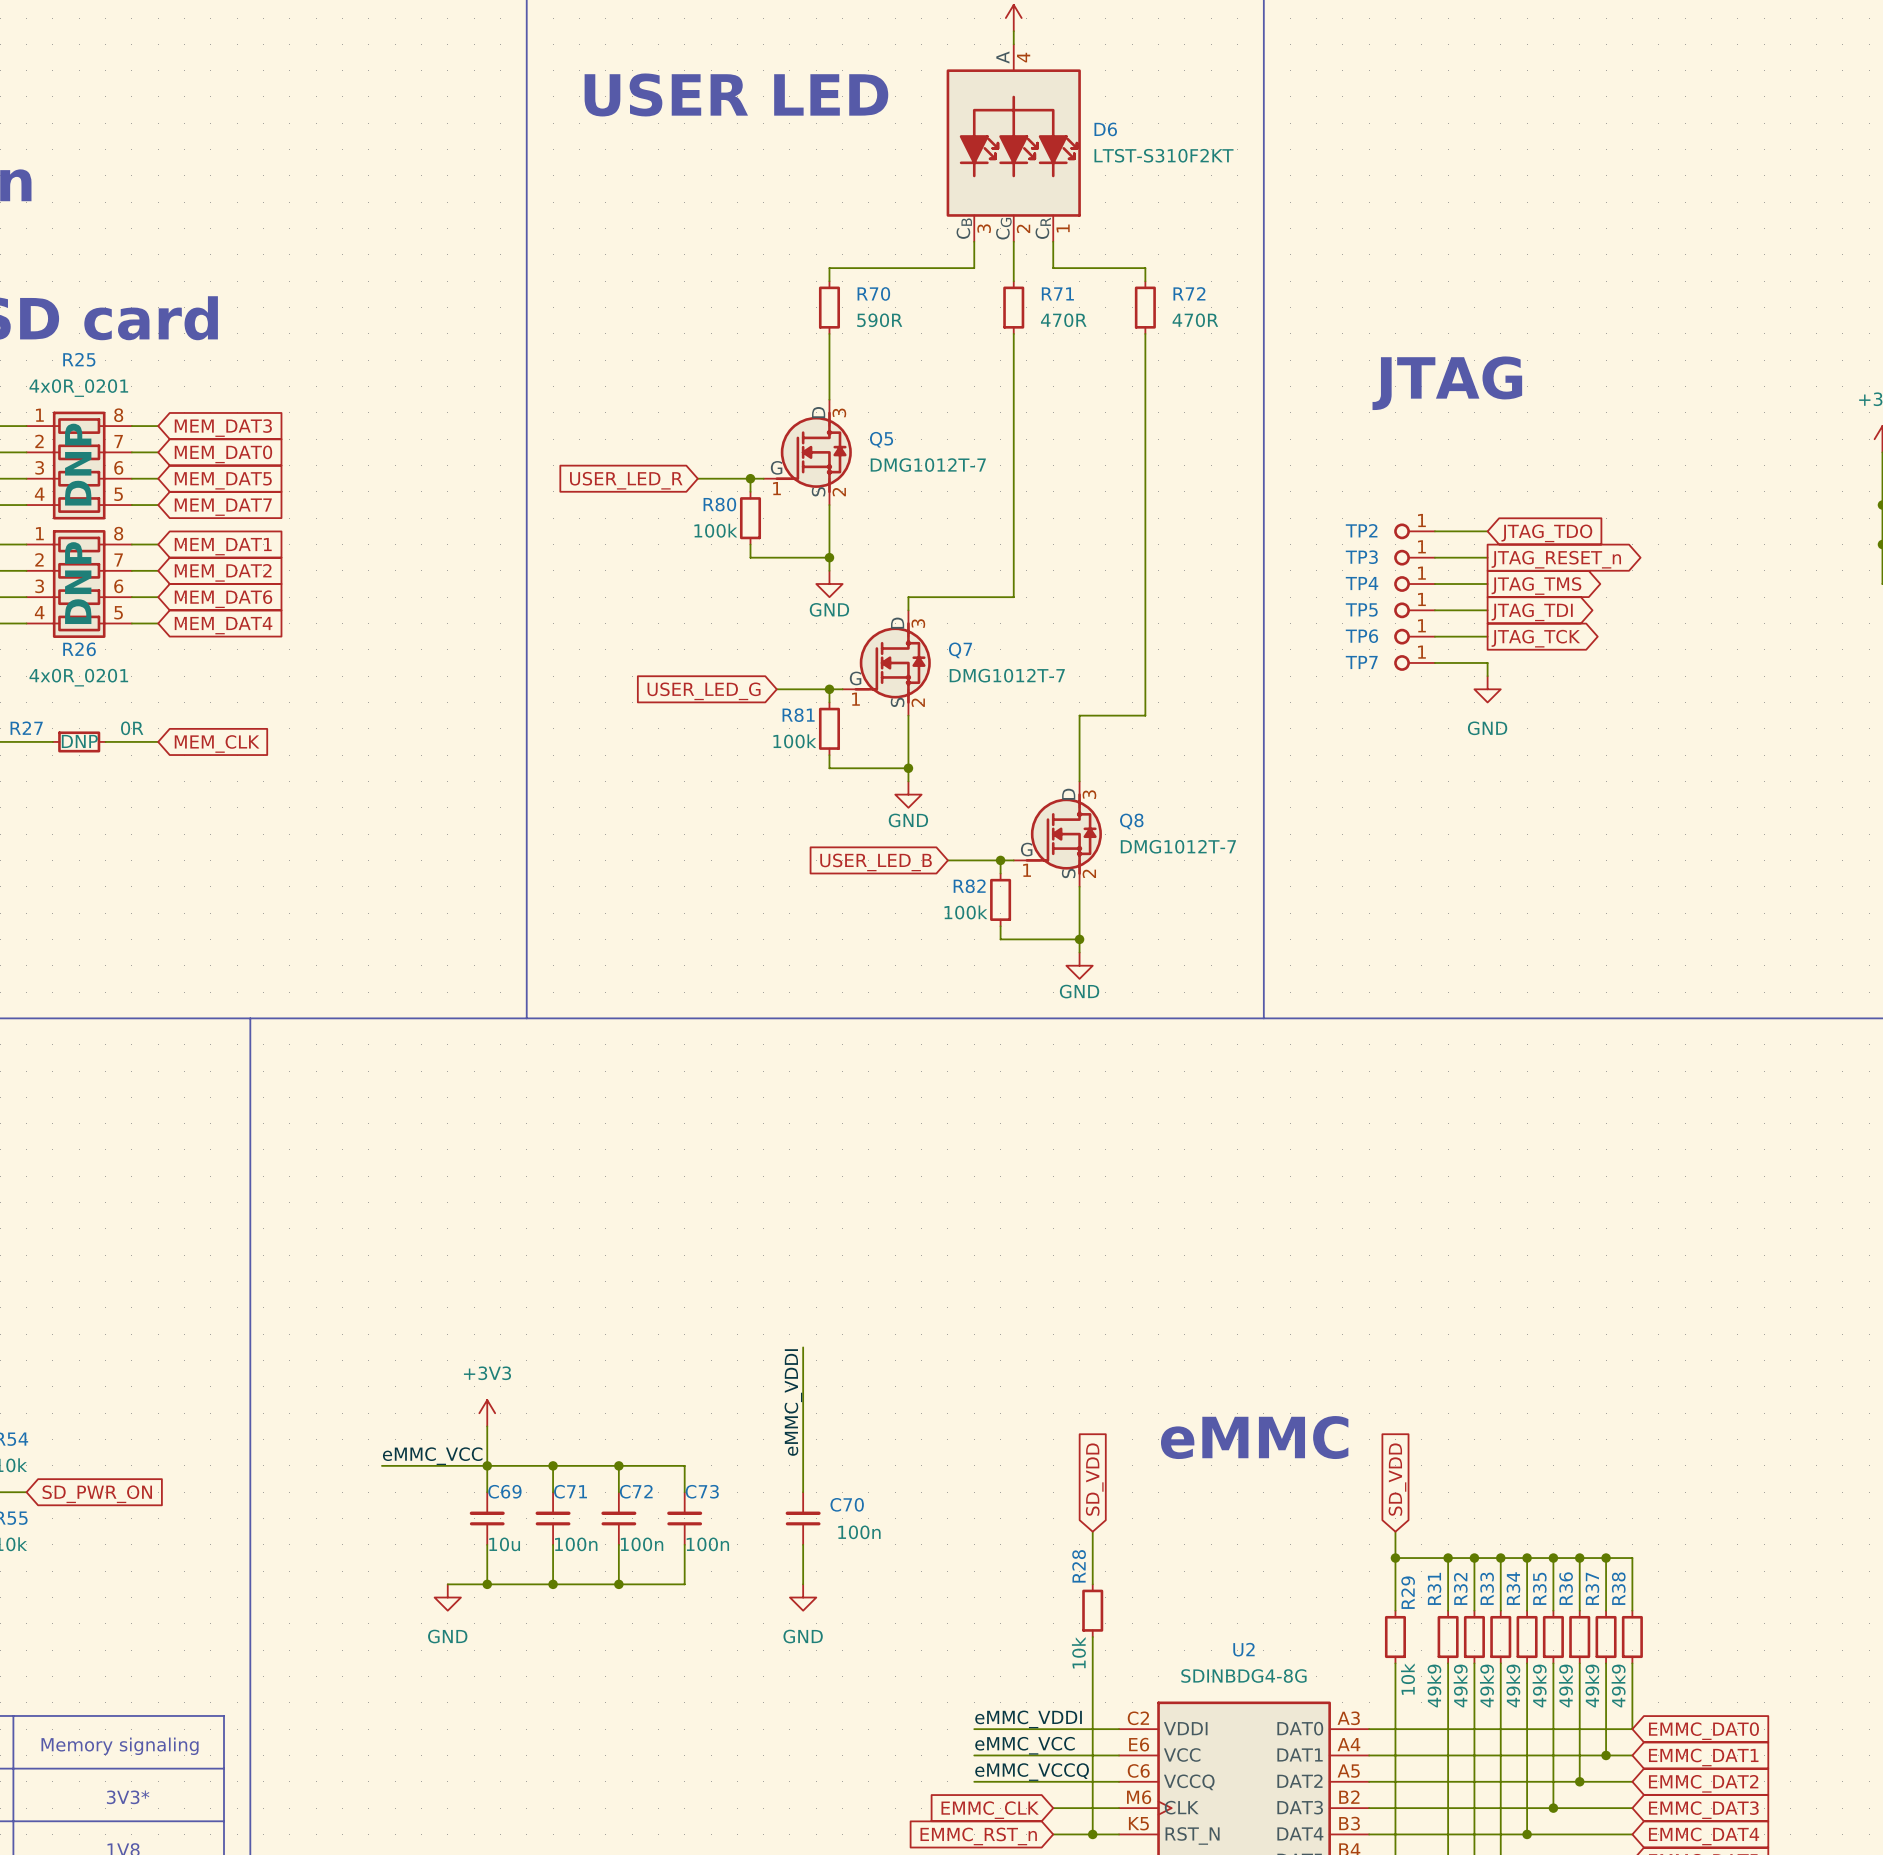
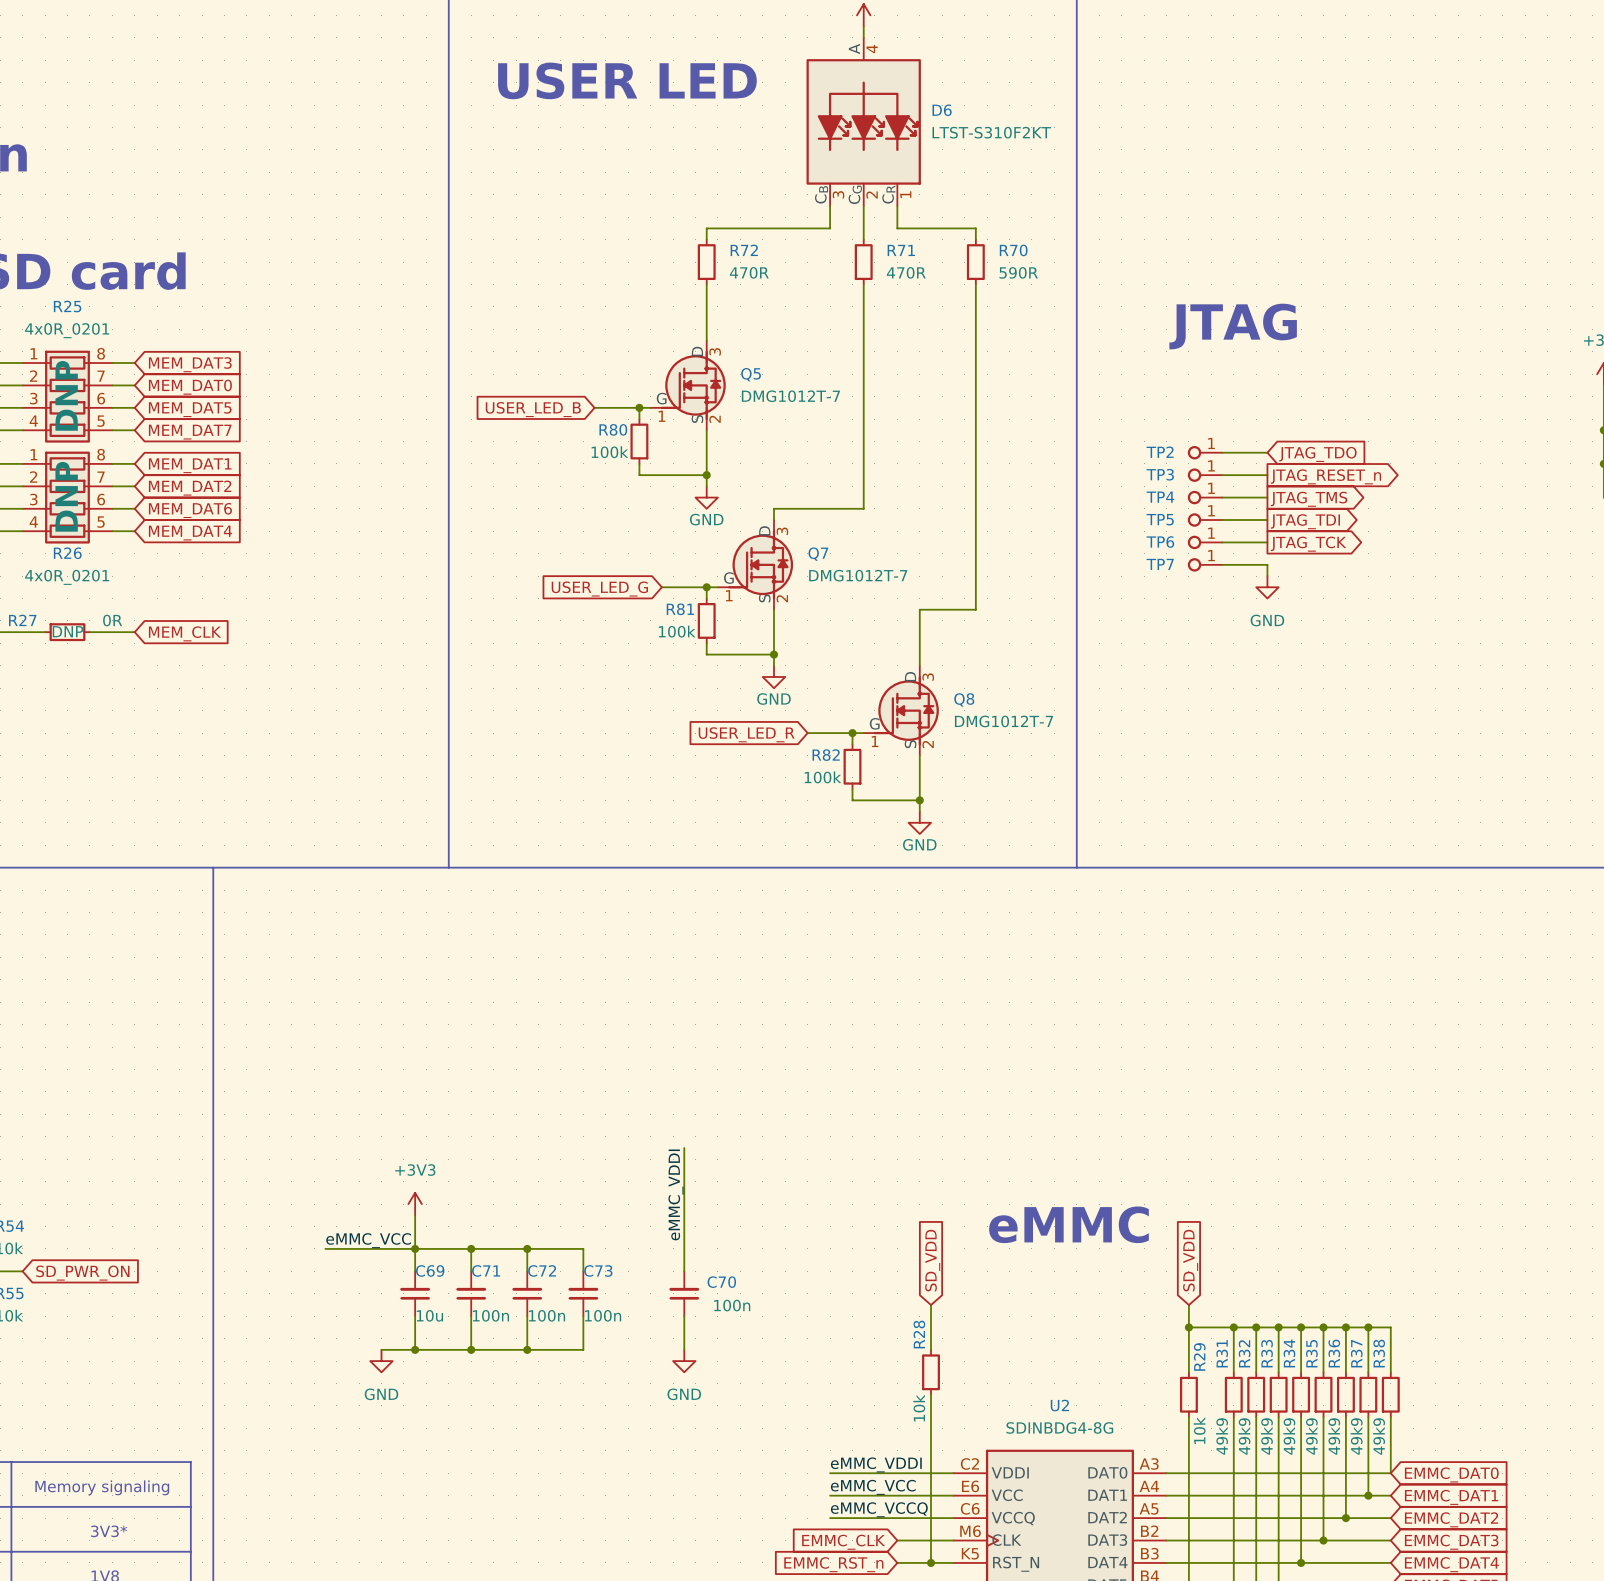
R70 name: R70 (873, 293) -> R72 (744, 250)
R72 name: R72 (1189, 293) -> R70 (1013, 250)
R70 text: 590R (879, 320) -> 470R (749, 272)
R72 text: 470R (1195, 320) -> 590R (1018, 272)
global label: USER_LED_R (626, 480) -> USER_LED_B (533, 409)
global label: USER_LED_B (876, 862) -> USER_LED_R (746, 734)

